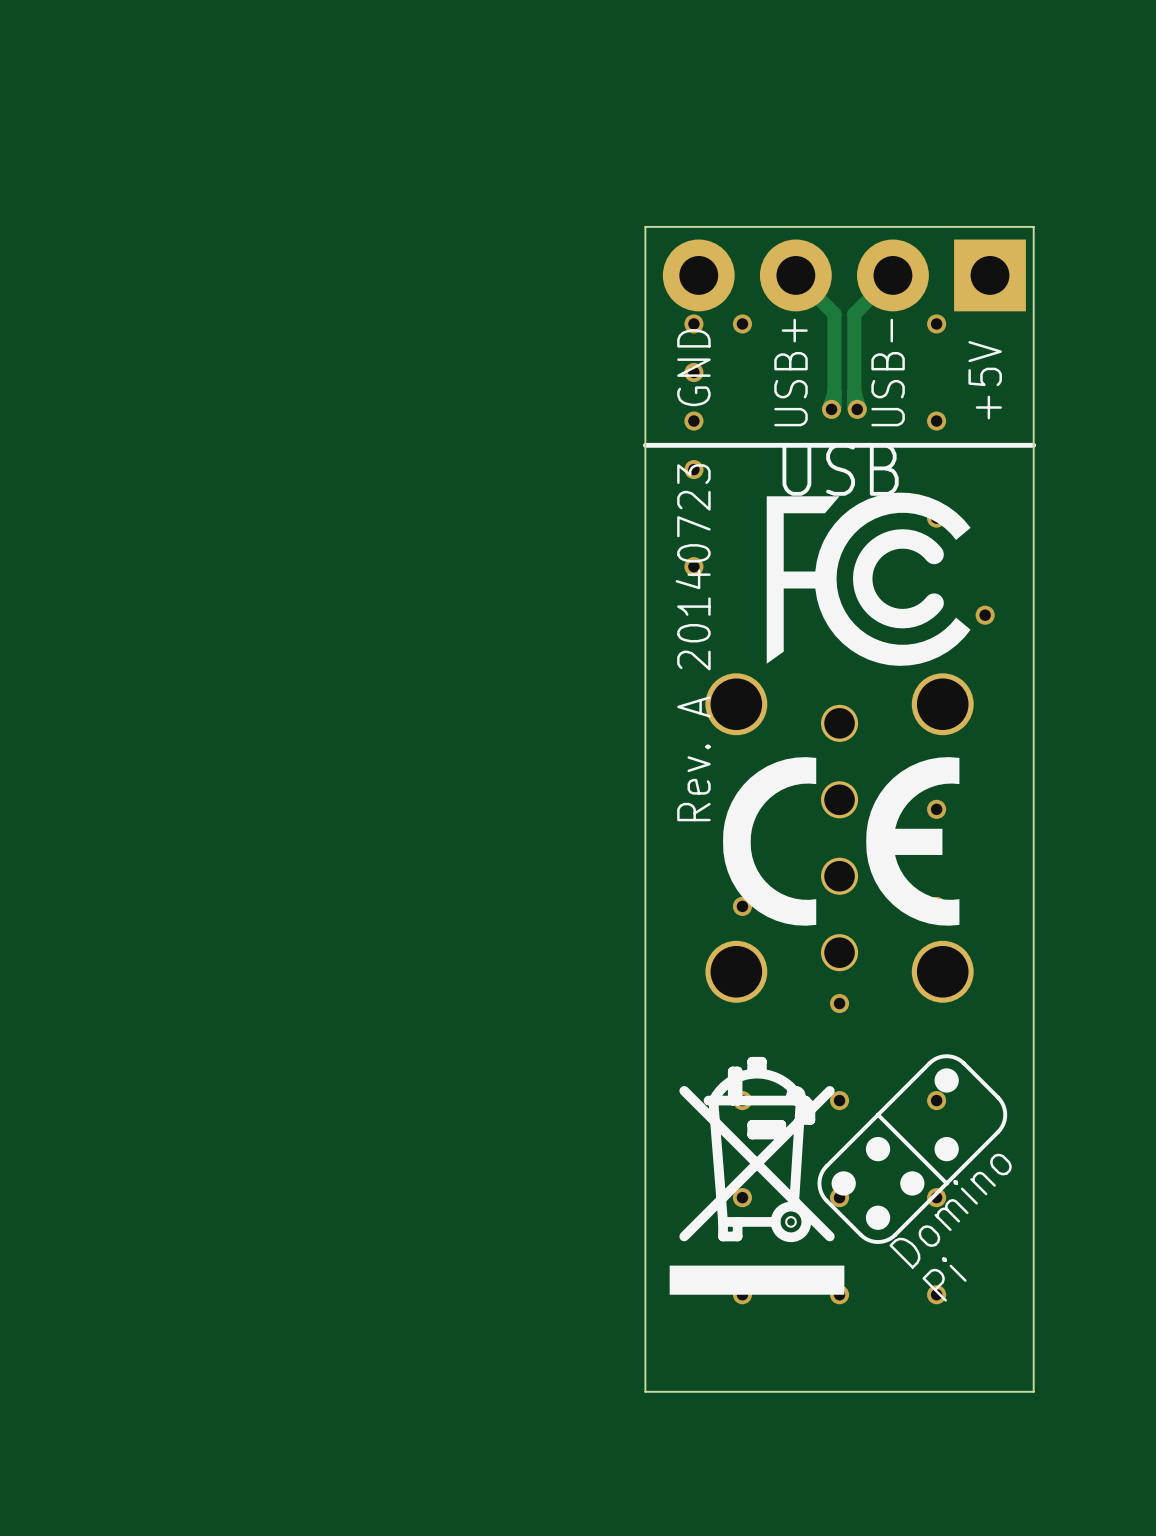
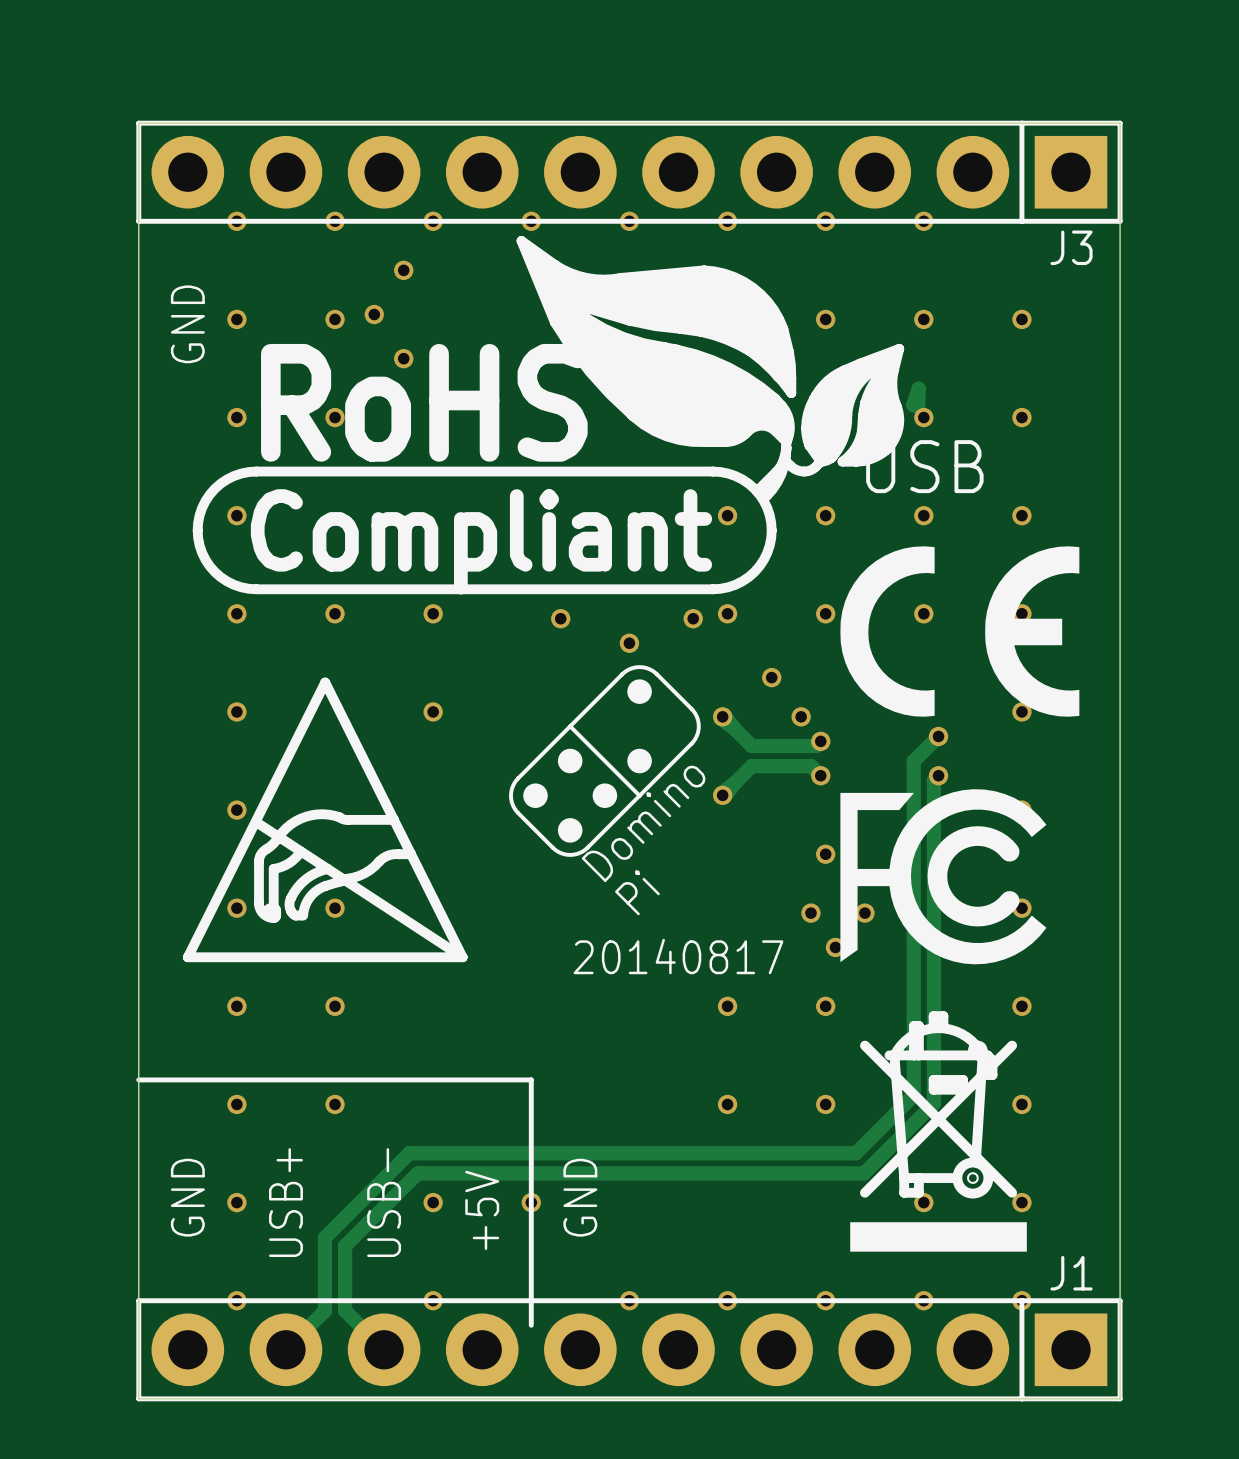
J3: none -> (629, 172)
via: none -> (236, 221)
via: none -> (335, 221)
via: none -> (433, 221)
via: none -> (531, 221)
via: none -> (629, 221)
via: none -> (727, 221)
via: none -> (825, 221)
via: none -> (923, 221)
board edge: (1033, 226) (645, 226) (645, 1391) -> (1120, 221) (1120, 123) (138, 123) (138, 1398) (727, 1398)
drawing: none -> [192, 236, 905, 595]
via: none -> (403, 270)
track: (795, 275) (834, 314) (834, 406) (831, 409) -> none
part: (844, 275) -> none
track: (892, 275) (854, 314) (854, 406) (857, 409) -> none
via: none -> (374, 314)
via: none -> (236, 319)
via: none -> (335, 319)
via: (693, 323) -> none
via: none -> (923, 319)
text: none -> GND (187, 324)
via: none -> (403, 358)
text: GND (693, 367) -> none
via: (693, 372) -> none
text: USB+ (791, 372) -> none
text: USB- (888, 372) -> none
text: +5V (985, 380) -> none
via: (831, 409) -> none
via: (857, 409) -> none
via: none -> (236, 417)
via: none -> (335, 417)
via: (693, 421) -> none
via: none -> (923, 417)
line: (1033, 445) (645, 445) -> none
via: (693, 469) -> none
via: none -> (236, 515)
via: none -> (727, 515)
via: none -> (825, 515)
via: none -> (923, 515)
via: (693, 566) -> none
text: 20140723 (693, 567) -> none
drawing position: (868, 579) -> (943, 876)
via: none -> (236, 613)
via: none -> (335, 613)
via: none -> (433, 613)
via: none -> (727, 613)
via: none -> (825, 613)
via: none -> (923, 613)
via position: (985, 615) -> (1021, 613)
via: none -> (560, 618)
via: none -> (693, 618)
via: none -> (629, 643)
drawing: none -> [182, 677, 468, 963]
via: none -> (771, 677)
via: none -> (236, 711)
via: none -> (433, 711)
via: none -> (1021, 711)
track: none -> (722, 716) (751, 746) (816, 746) (820, 741)
via: none -> (722, 716)
via: none -> (801, 716)
track: none -> (938, 736) (913, 761) (913, 1095) (855, 1153) (409, 1153) (324, 1237) (324, 1310) (285, 1349)
via: none -> (938, 736)
via: none -> (820, 741)
text: Rev. A (693, 758) -> none
track: none -> (820, 775) (811, 766) (751, 766) (722, 795)
via: none -> (820, 775)
track: none -> (938, 775) (933, 780) (933, 1103) (864, 1173) (417, 1173) (345, 1246) (345, 1310) (384, 1349)
via: none -> (938, 775)
via: none -> (722, 795)
via: none -> (236, 810)
part: (839, 838) -> none
drawing position: (841, 841) -> (959, 631)
via: none -> (825, 854)
via: none -> (236, 908)
via: none -> (335, 908)
via position: (742, 906) -> (810, 913)
via: none -> (864, 913)
via: none -> (835, 947)
text: none -> 20140817 (678, 956)
via: none -> (236, 1006)
via: none -> (335, 1006)
via: none -> (727, 1006)
via: none -> (825, 1006)
via: (839, 1003) -> none
via: none -> (1021, 1006)
line: none -> (138, 1079) (531, 1079) (531, 1325)
via: none -> (236, 1104)
via: none -> (335, 1104)
via: none -> (727, 1104)
via: (839, 1100) -> none
drawing position: (912, 1149) -> (604, 761)
drawing position: (757, 1175) -> (938, 1131)
text: none -> GND (187, 1197)
text: none -> GND (580, 1197)
via: none -> (236, 1202)
text: none -> USB+ (285, 1202)
text: none -> USB- (384, 1202)
via: none -> (433, 1202)
via: none -> (531, 1202)
via: (742, 1197) -> none
text: none -> +5V (482, 1210)
via: none -> (236, 1300)
via: none -> (433, 1300)
via: none -> (629, 1300)
via: none -> (727, 1300)
J1: none -> (629, 1349)

